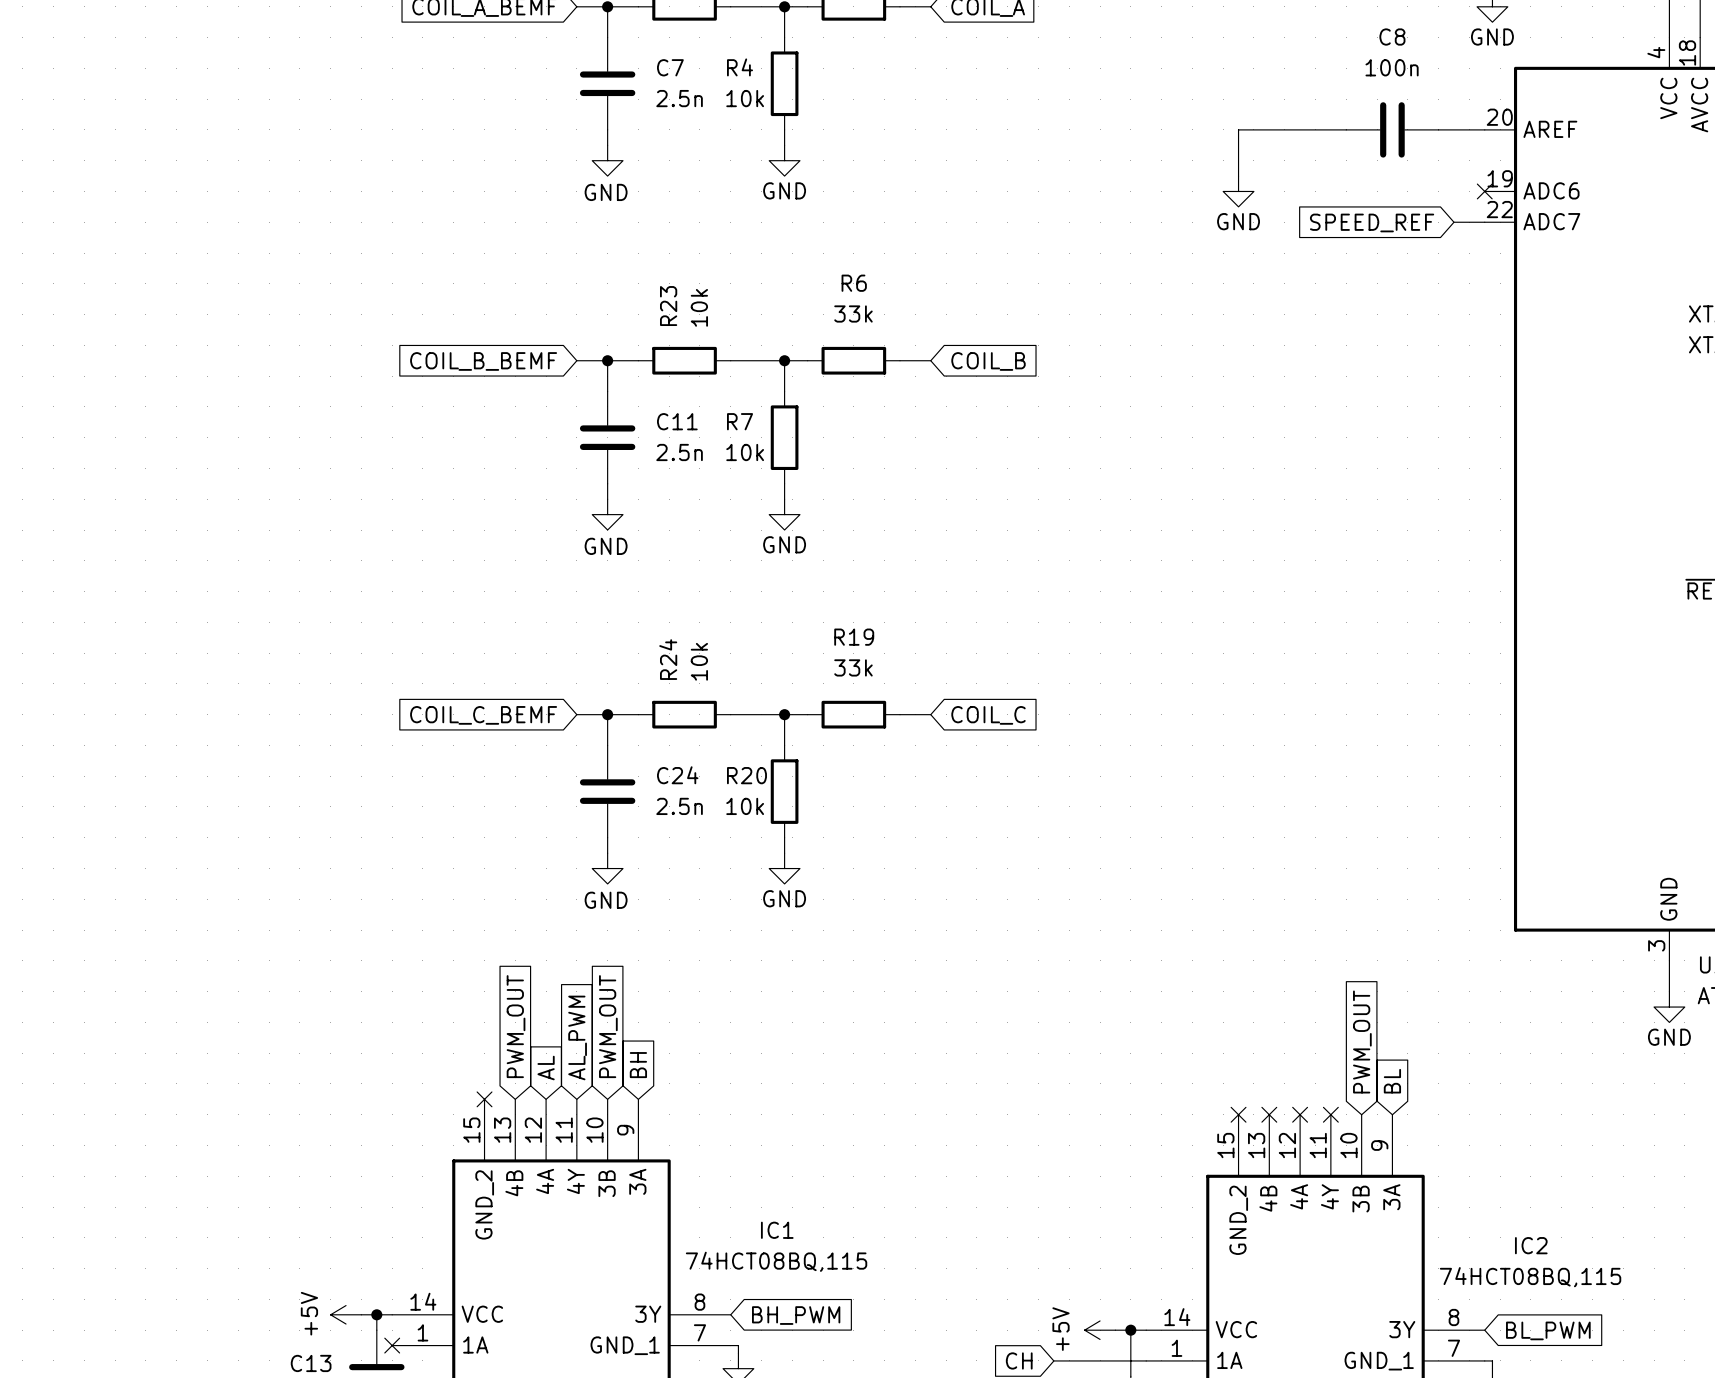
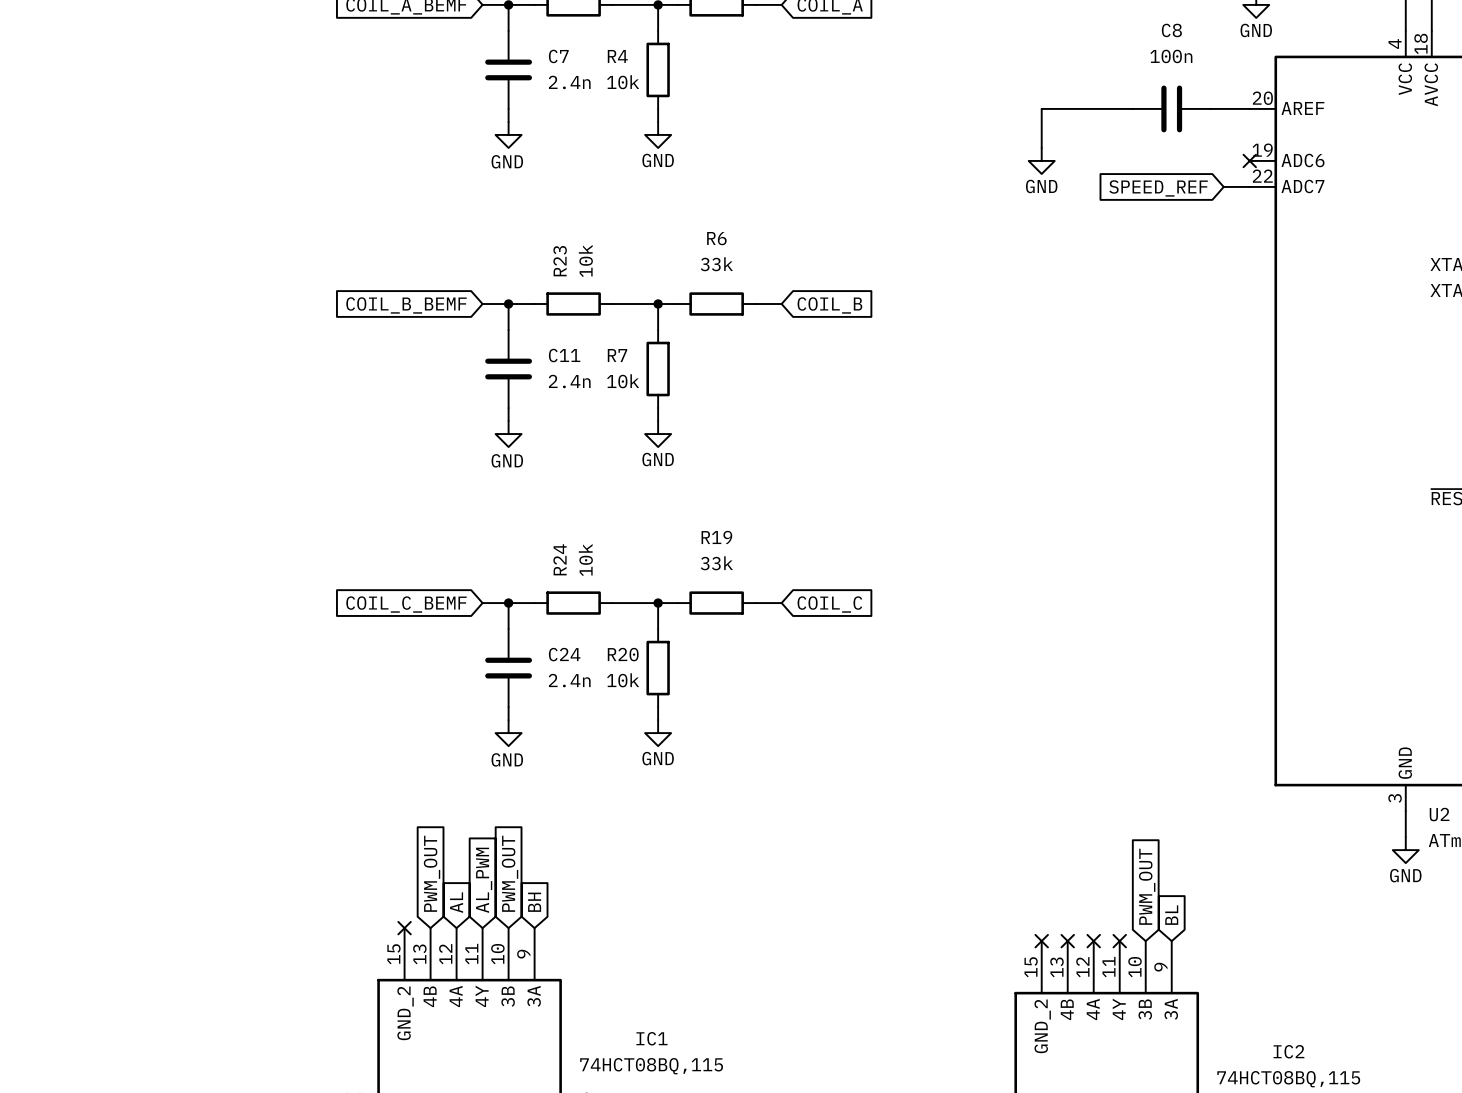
C7 value: 2.5n (679, 98) -> 2.4n (569, 82)
C11 value: 2.5n (679, 452) -> 2.4n (569, 381)
C24 value: 2.5n (679, 806) -> 2.4n (569, 680)

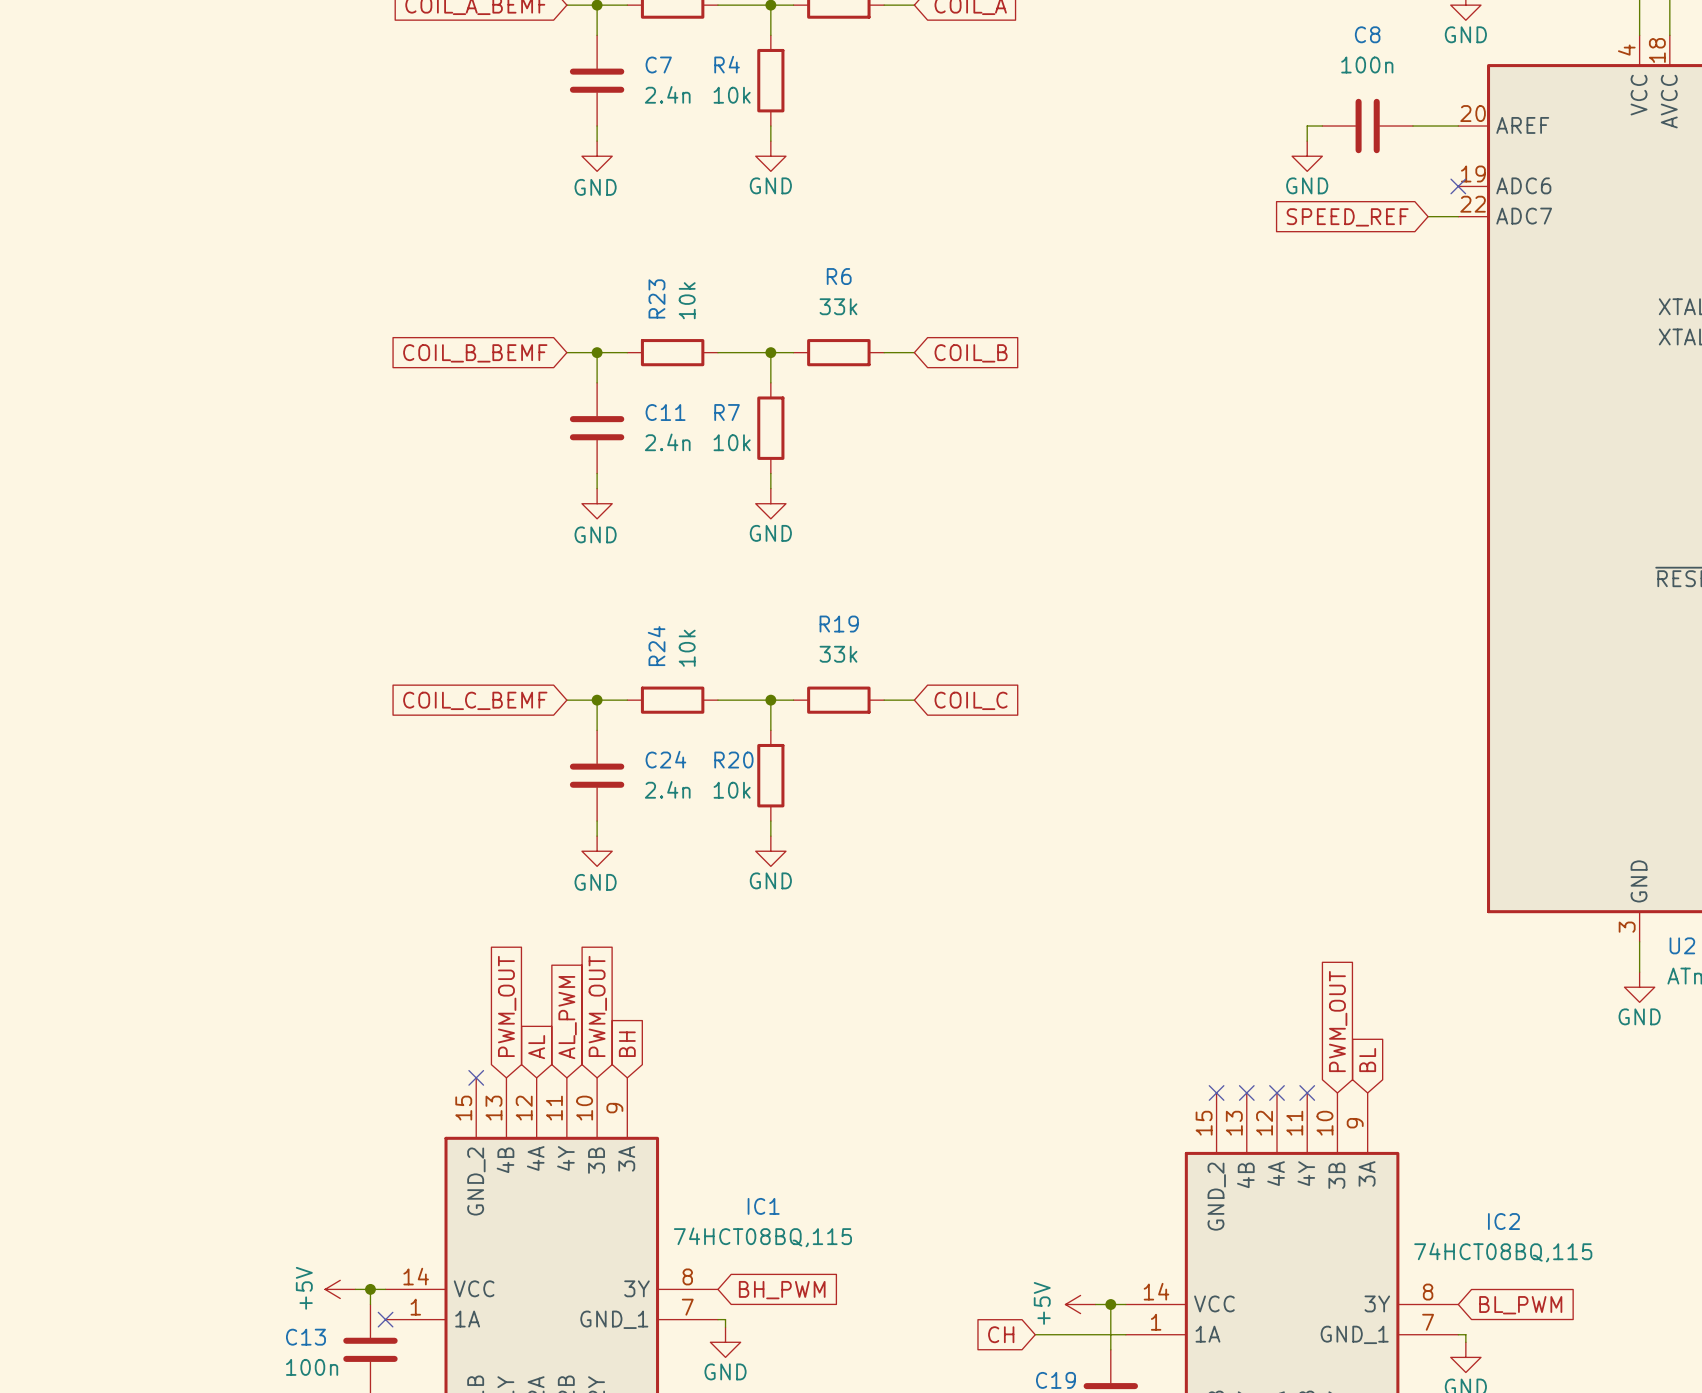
wire: (1119, 108) (1041, 108) (1041, 147) -> (1307, 126) (1307, 141)
power symbol position: GND (1041, 160) -> GND (1307, 156)

